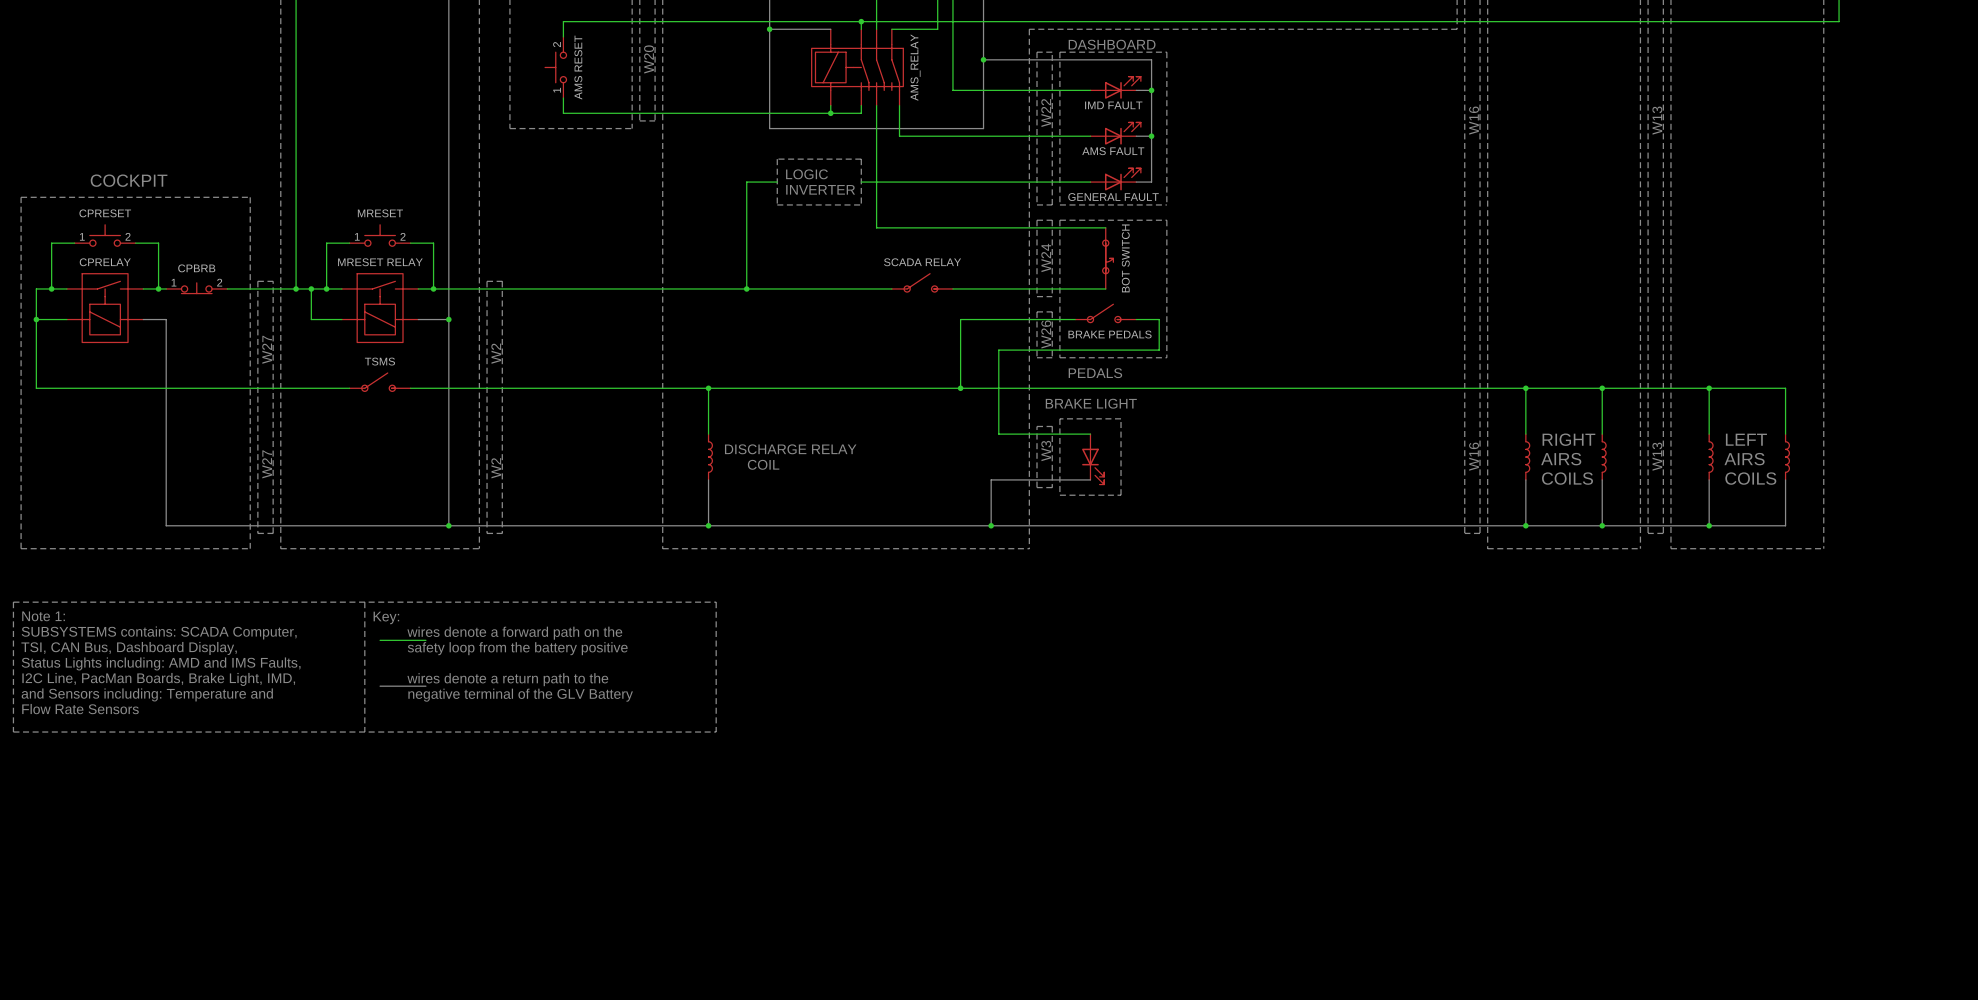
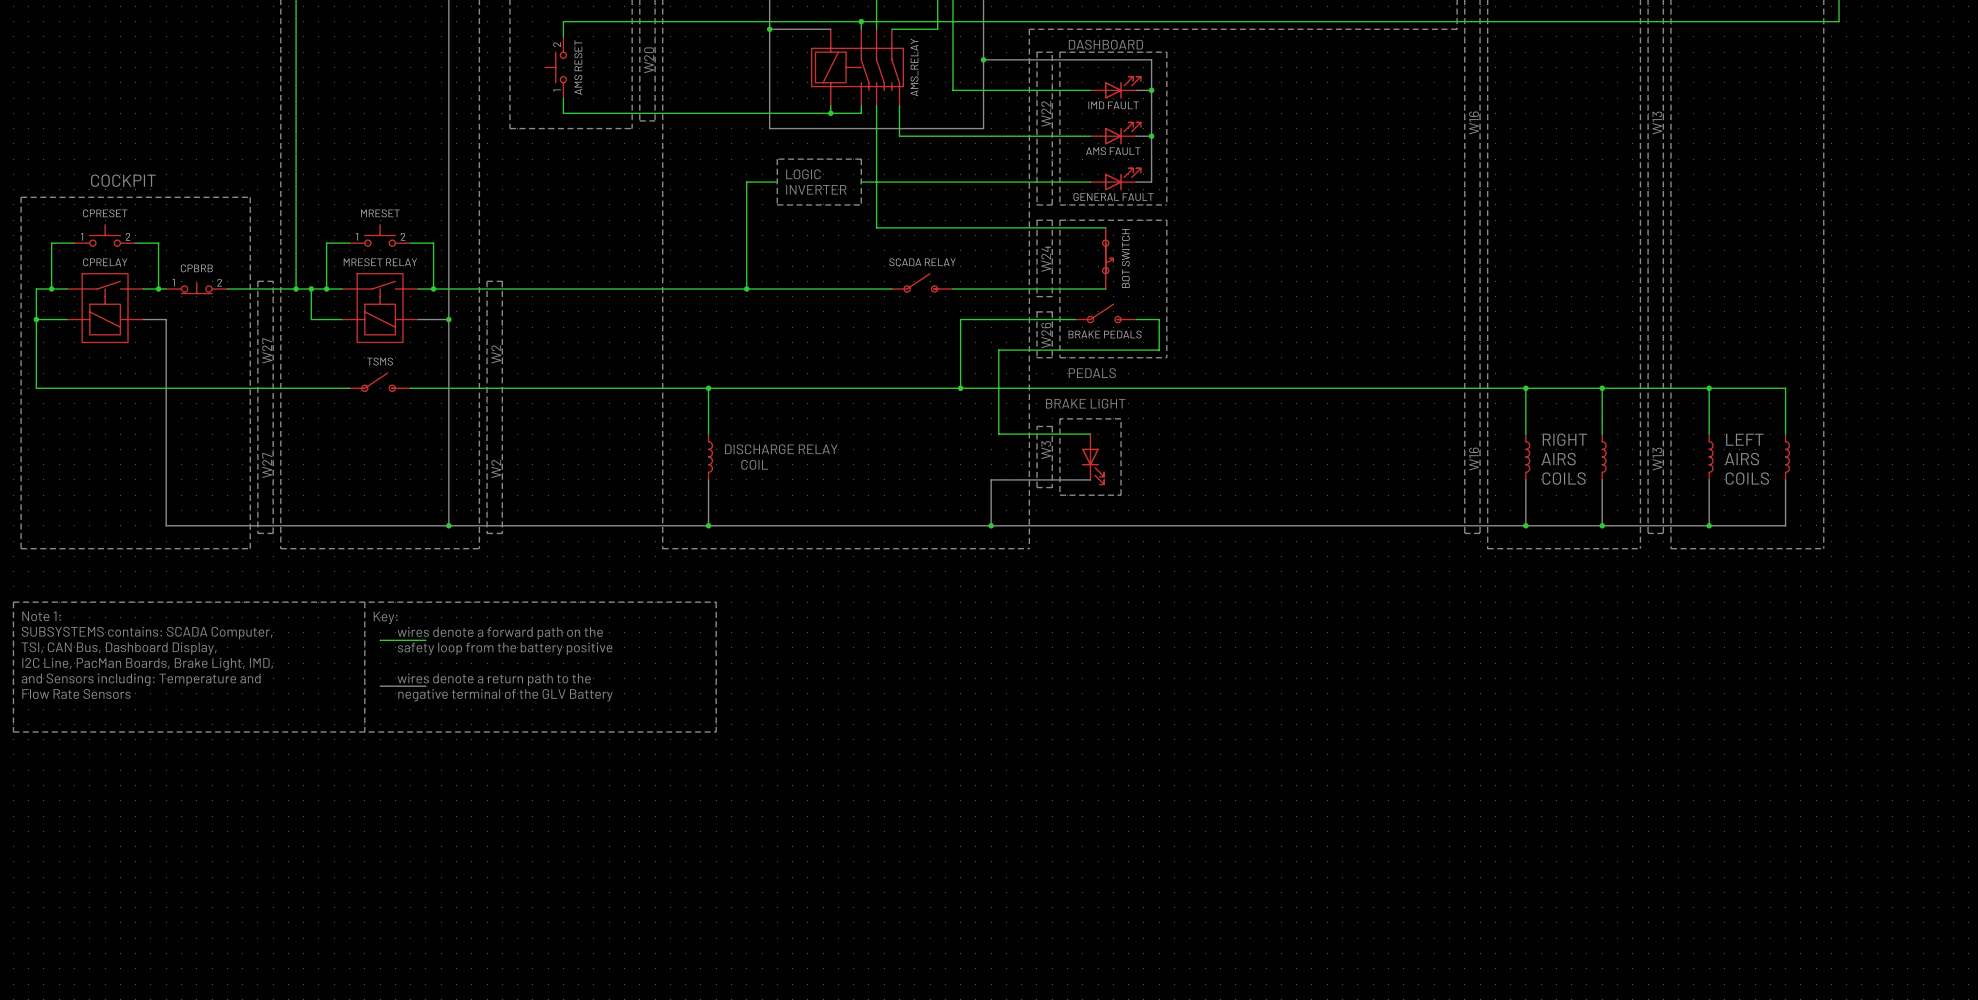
text: Status Lights including: AMD and IMS Faults, (161, 663) -> I2C Line, PacMan Boards, Brake Light, IMD, (147, 664)
text: I2C Line, PacMan Boards, Brake Light, IMD, (158, 679) -> and Sensors including: Temperature and (141, 679)
text: and Sensors including: Temperature and (147, 694) -> Flow Rate Sensors (76, 693)
text: Flow Rate Sensors (80, 709) -> none

